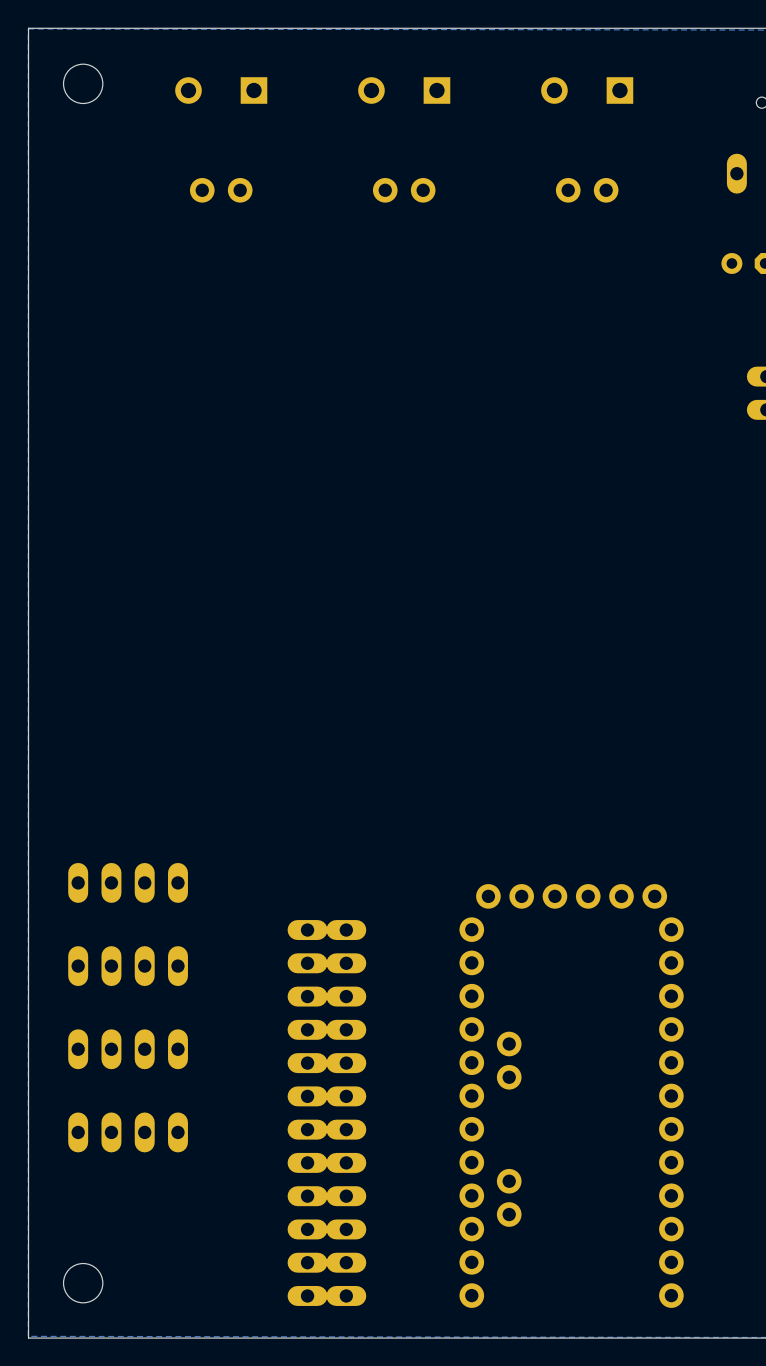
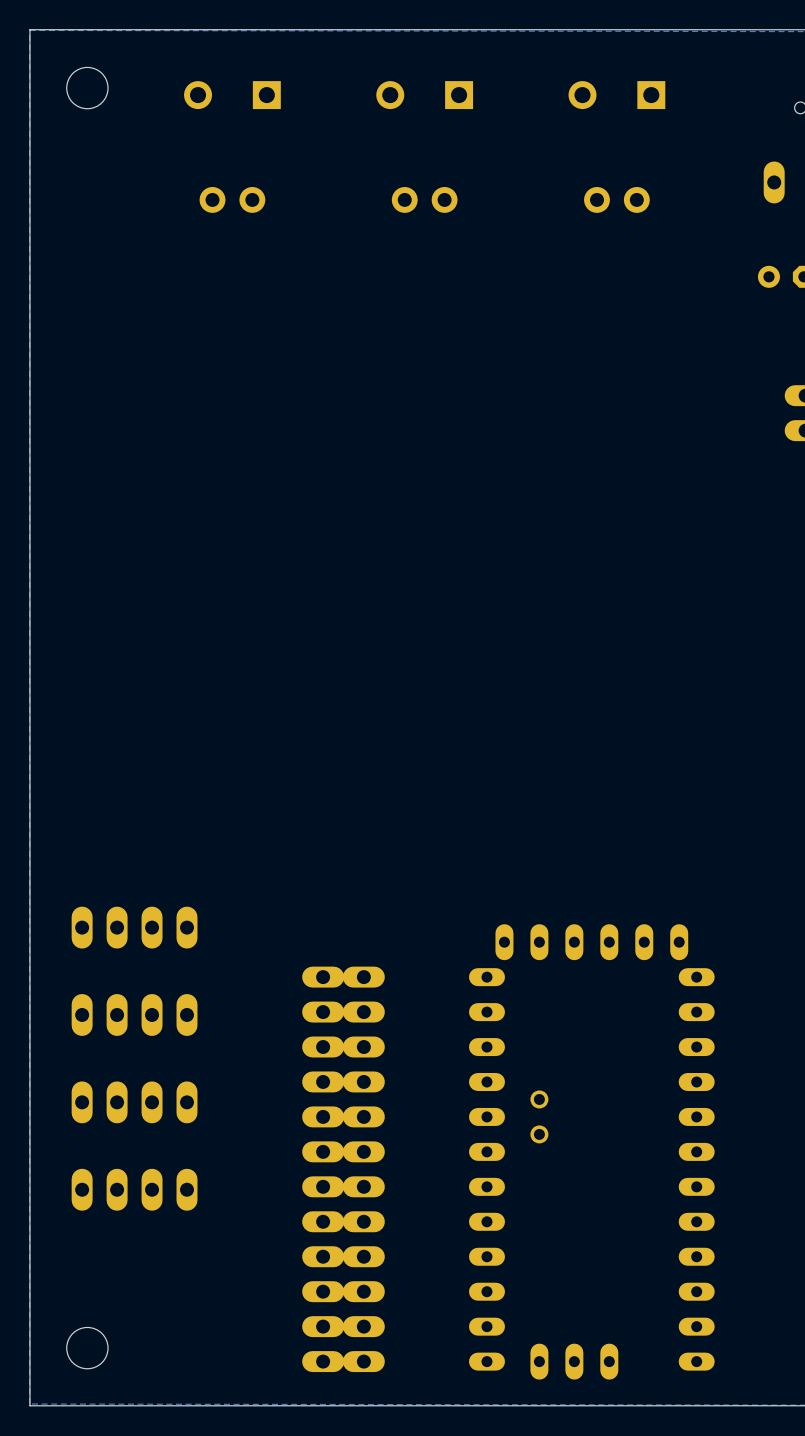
part footprint: [459, 884, 684, 1308] -> [468, 924, 715, 1380]

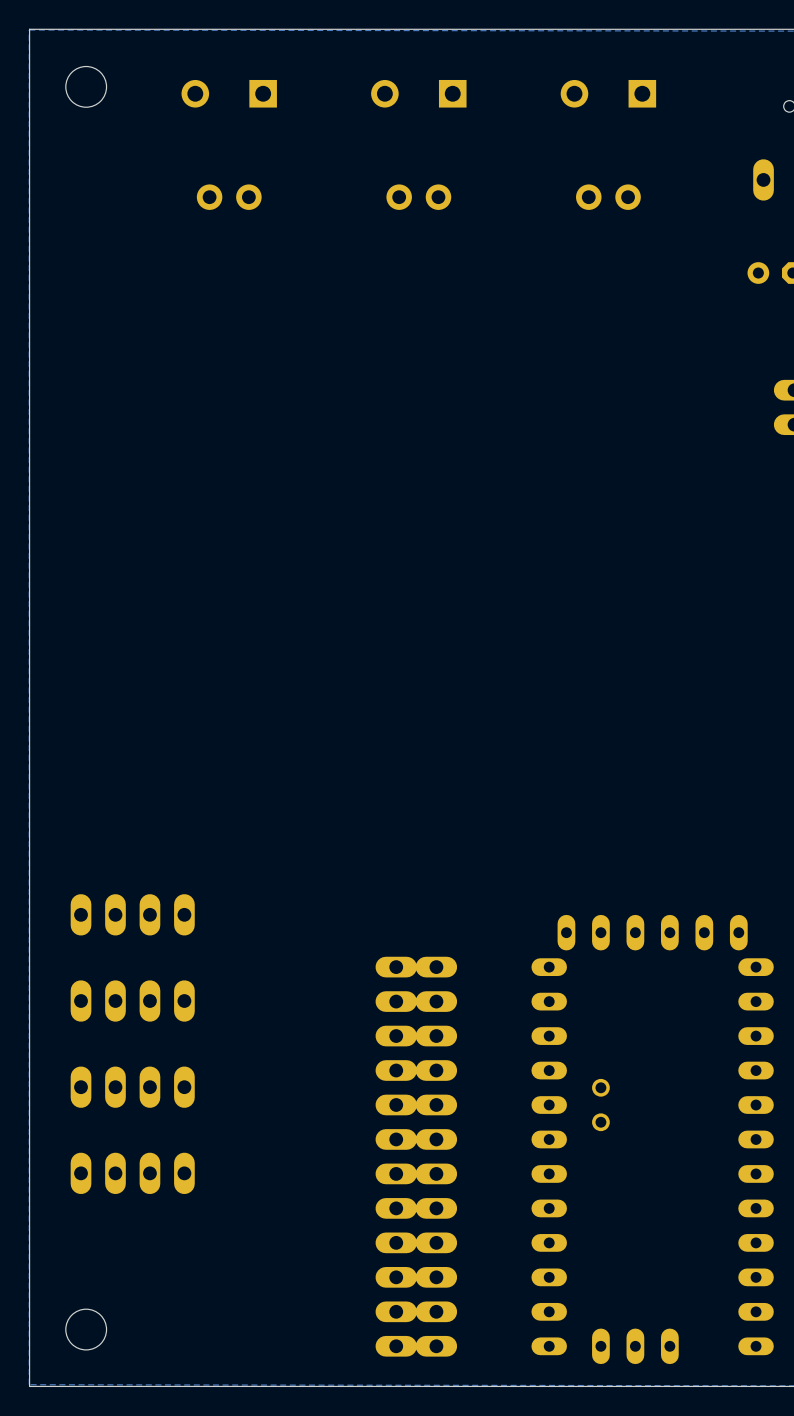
part position: (591, 1151) -> (652, 1139)
part: (323, 1169) -> none
part position: (363, 1169) -> (396, 1156)
part: none -> (436, 1156)

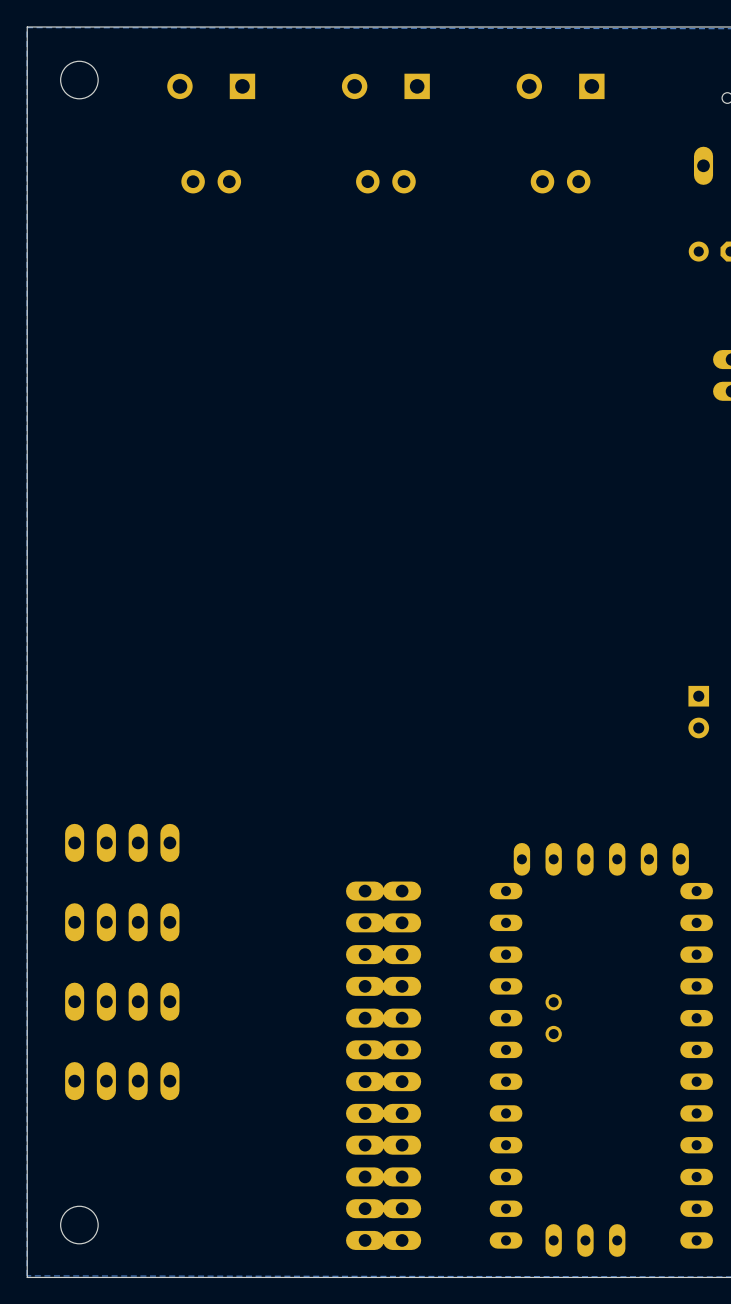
part: none -> (698, 712)

